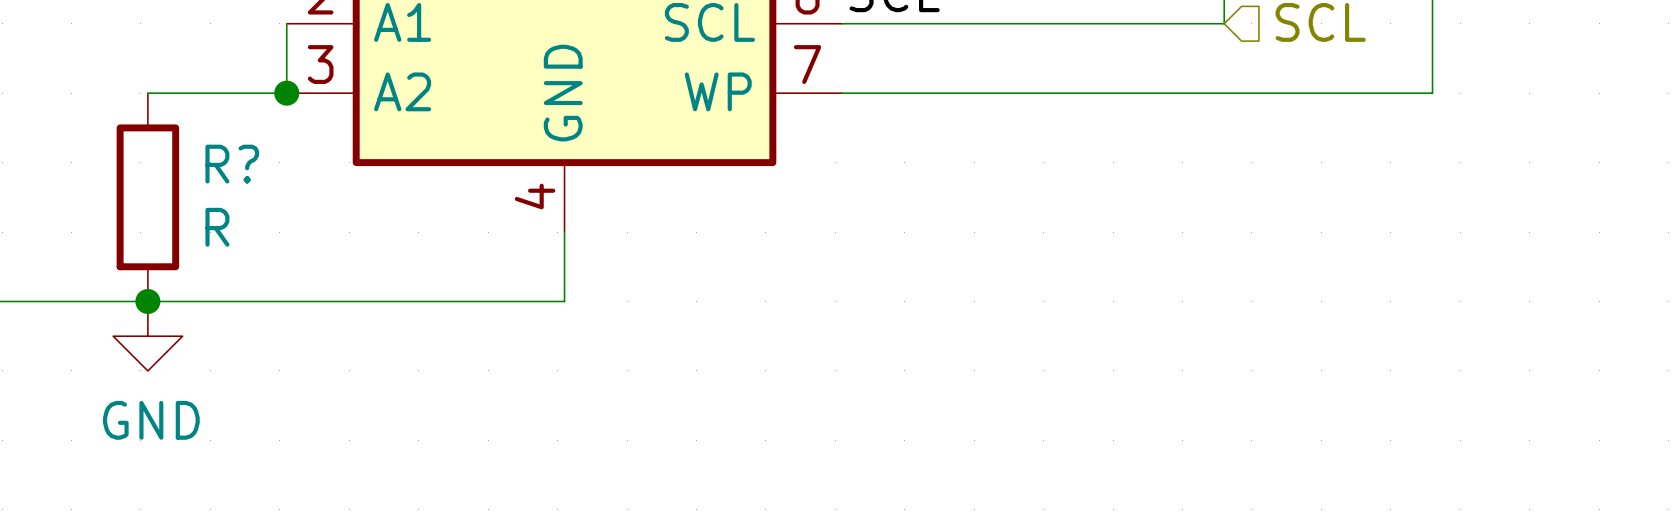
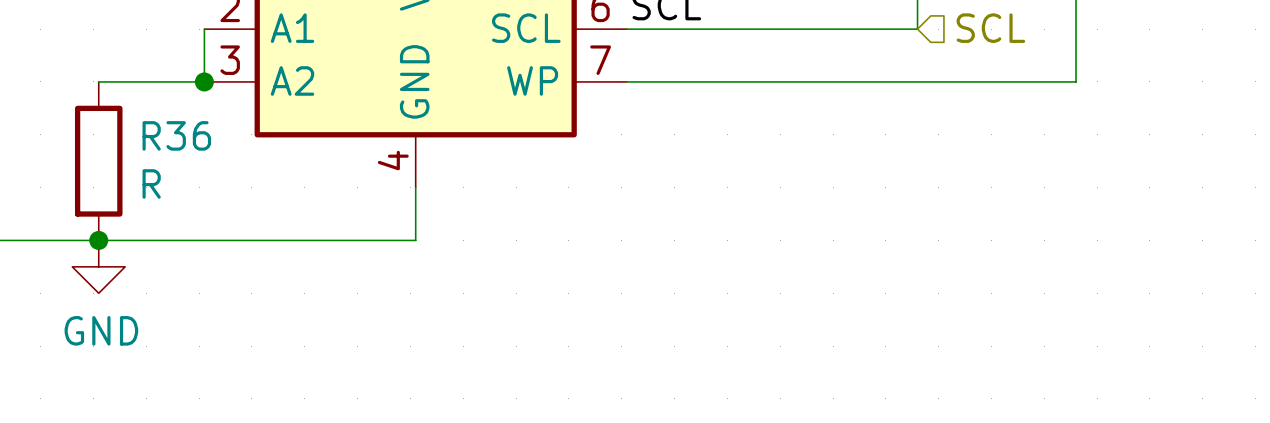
R? name: R? (232, 164) -> R36 (176, 135)

